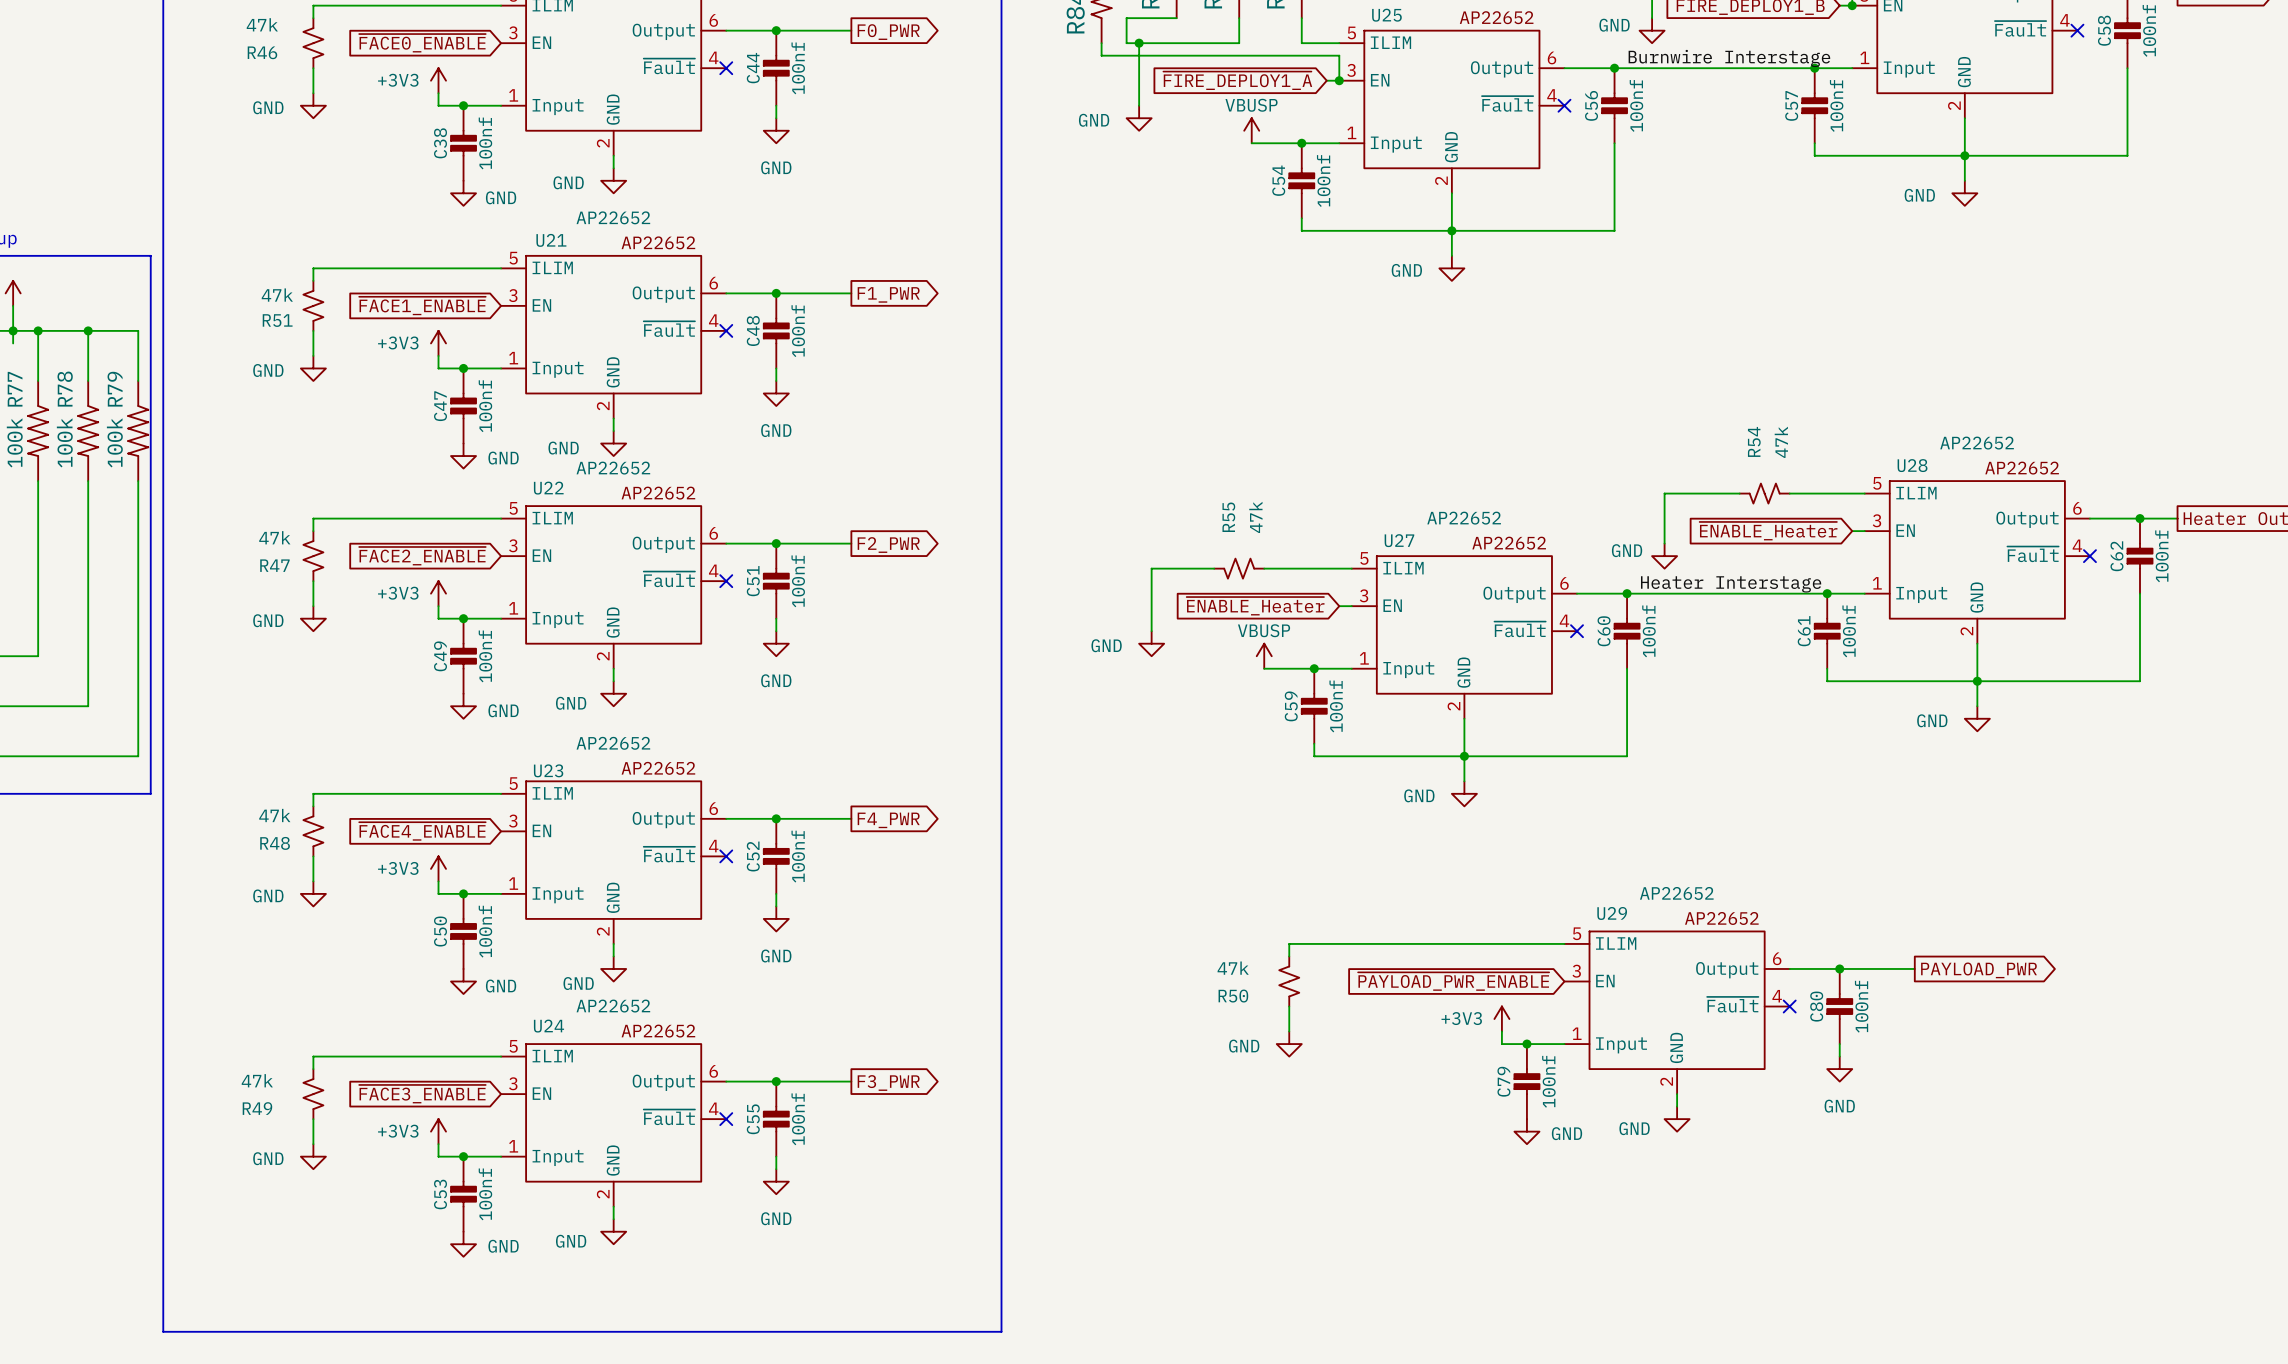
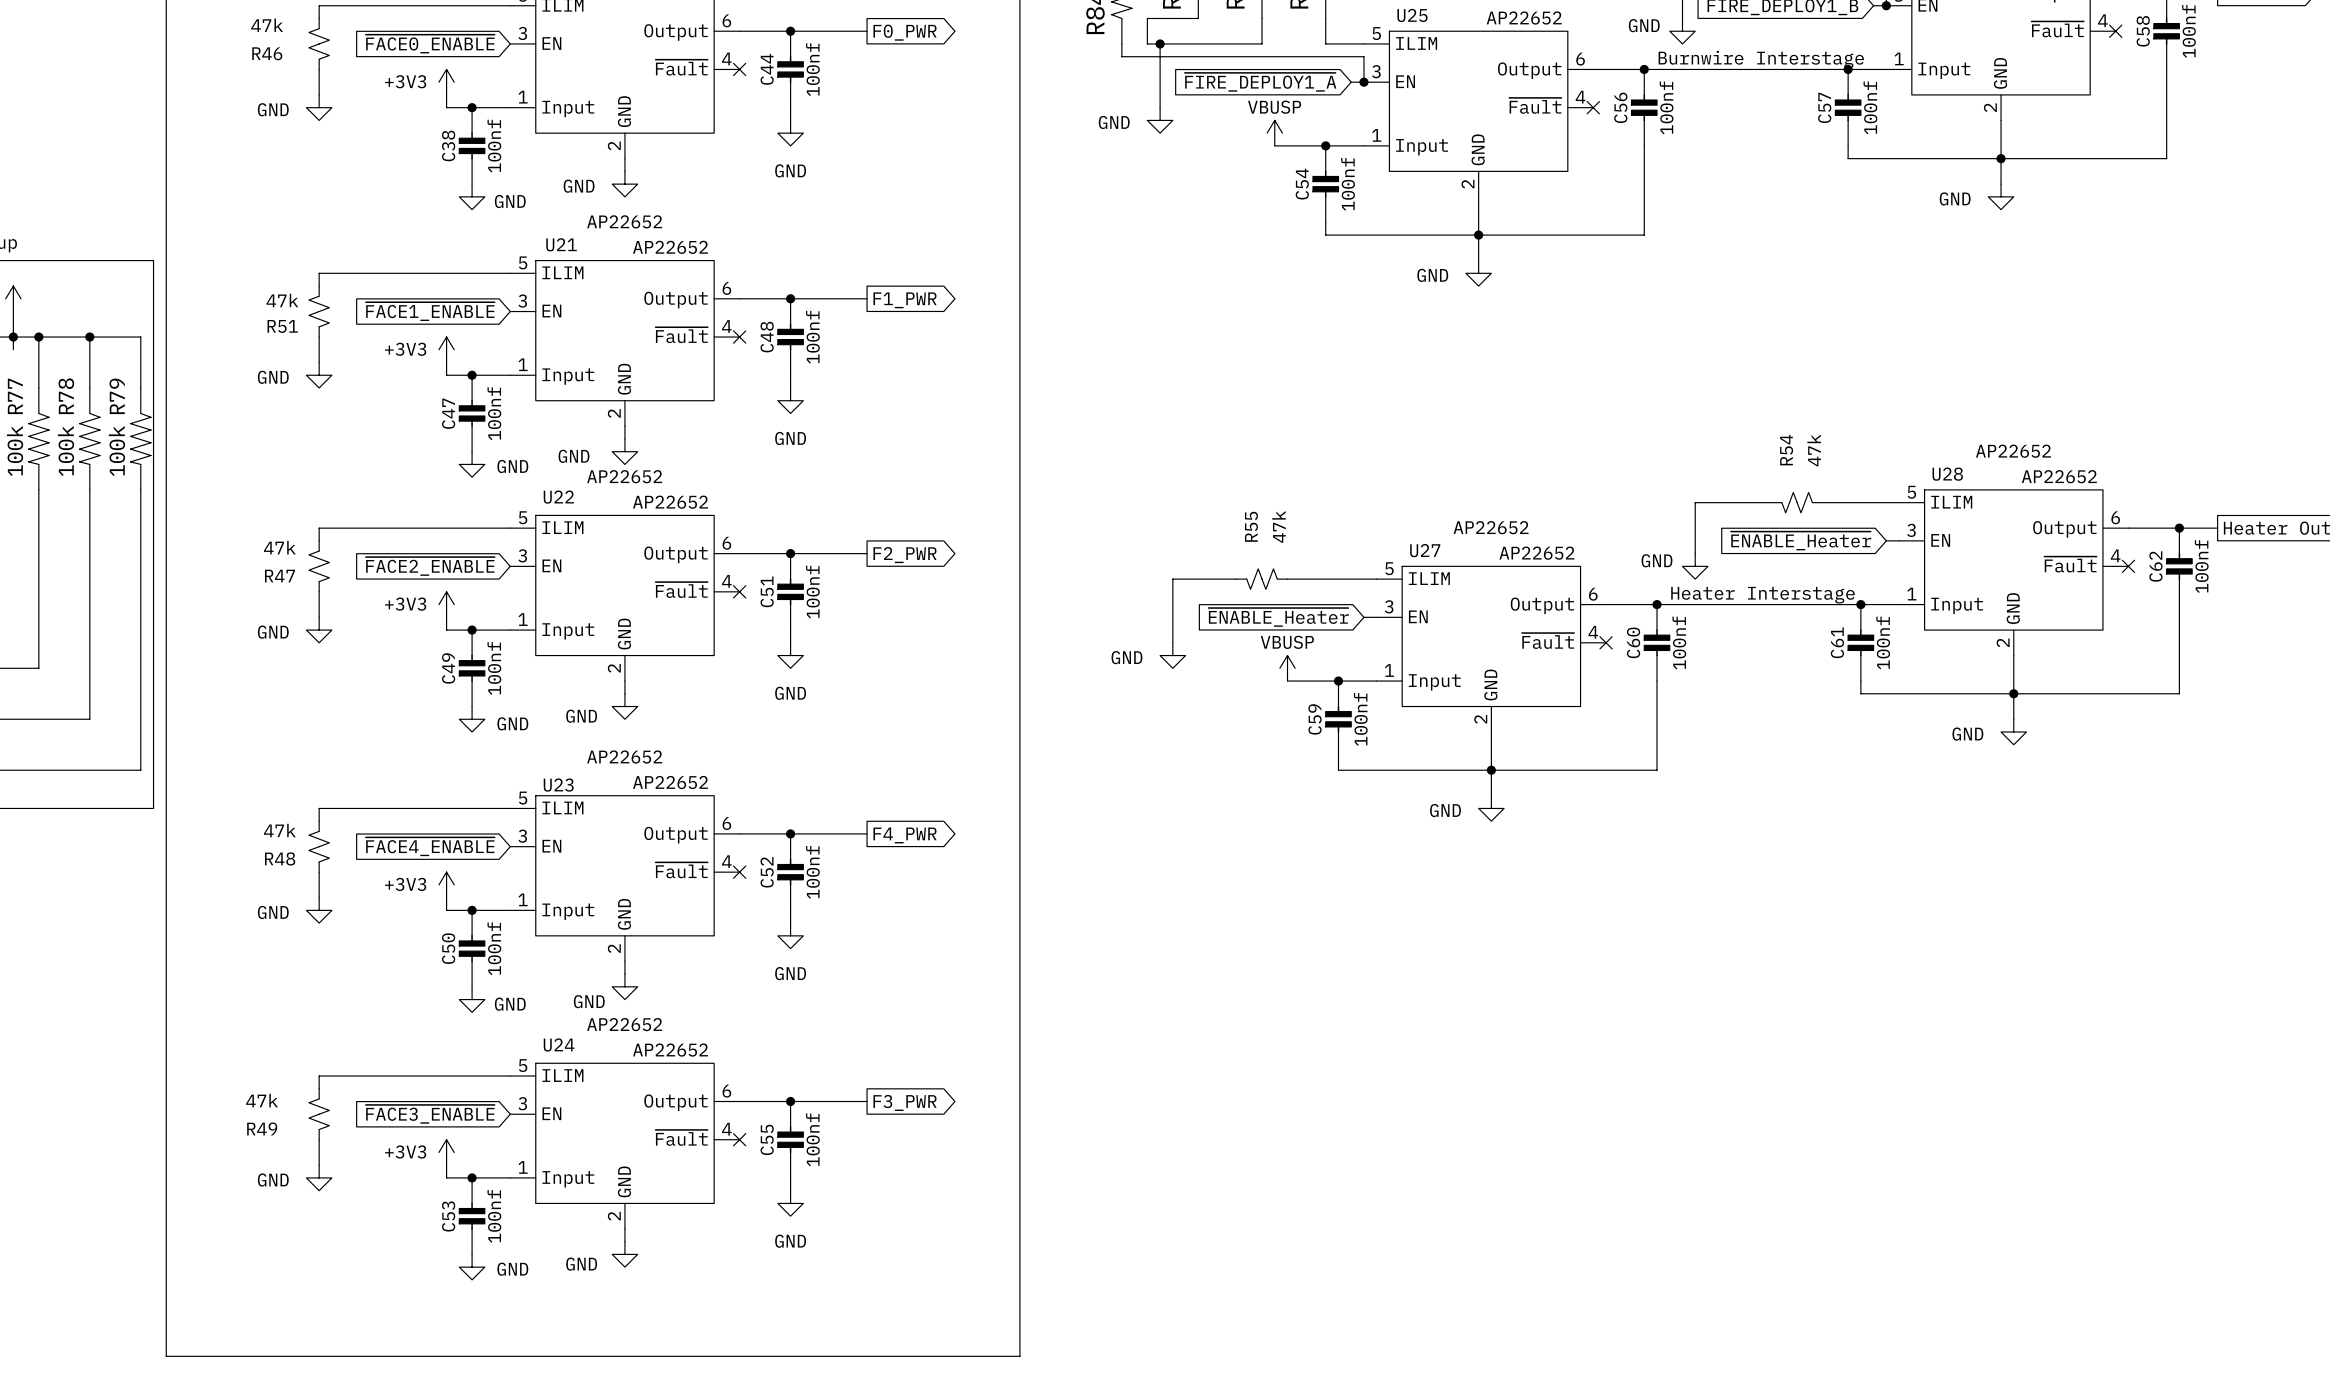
wire: (1564, 943) (1289, 943) (1289, 956) -> none
wire: (1789, 968) (1914, 968) -> none
junction: (1839, 968) -> none
global label: PAYLOAD_PWR (1978, 970) -> none
R50: 47k (1289, 981) -> none
global label: ~{PAYLOAD_PWR_ENABLE} (1453, 981) -> none
wire: (1289, 1006) (1289, 1031) -> none
no-connect mark: (1789, 1006) -> none
C80: 100nf (1839, 1006) -> none
U29: AP22652 (1677, 1012) -> none
power symbol: +3V3 (1501, 1019) -> none
wire: (1501, 1031) (1501, 1044) (1564, 1044) -> none
power symbol: GND (1289, 1044) -> none
junction: (1526, 1044) -> none
wire: (1839, 1044) (1839, 1056) -> none
power symbol: GND (1839, 1069) -> none
C79: 100nf (1526, 1081) -> none
wire: (1677, 1094) (1677, 1106) -> none
power symbol: GND (1677, 1119) -> none
power symbol: GND (1526, 1131) -> none

